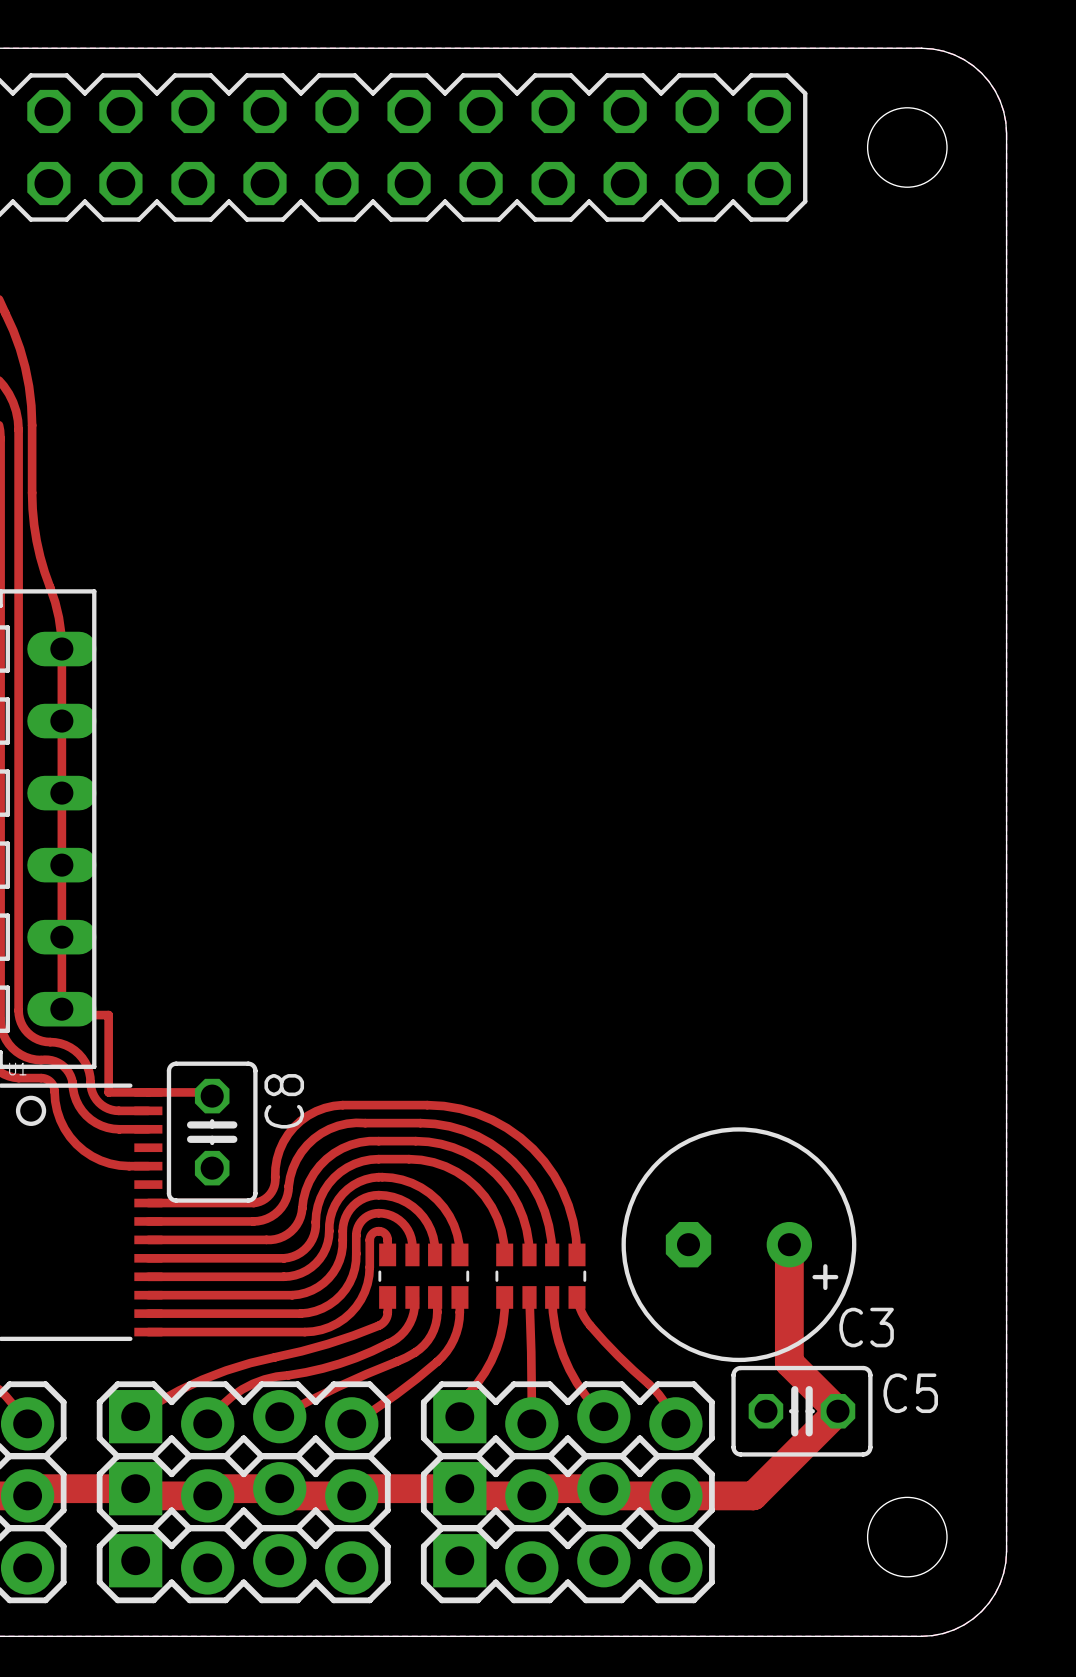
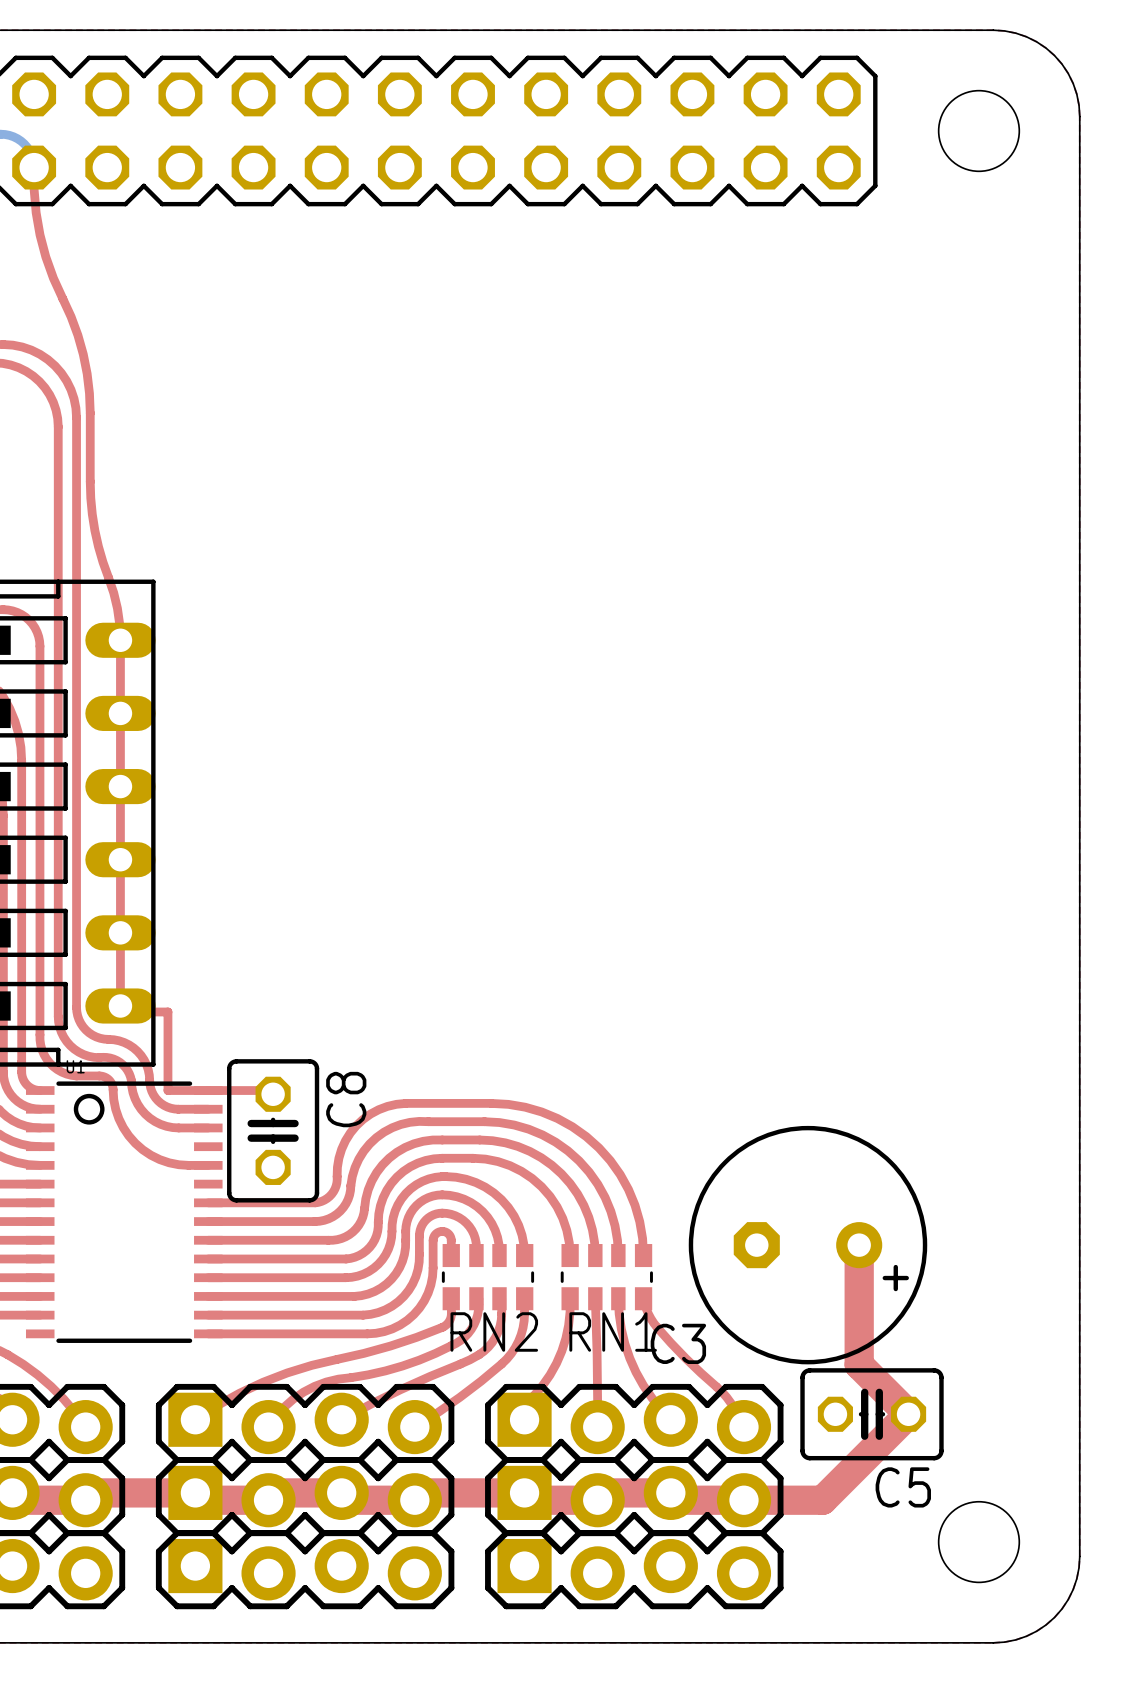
C3 name position: C3 (866, 1327) -> C3 (678, 1343)
RN2 name: none -> RN2 (494, 1331)
RN1 name: none -> RN1 (613, 1331)
C5 name position: C5 (910, 1393) -> C5 (903, 1487)

